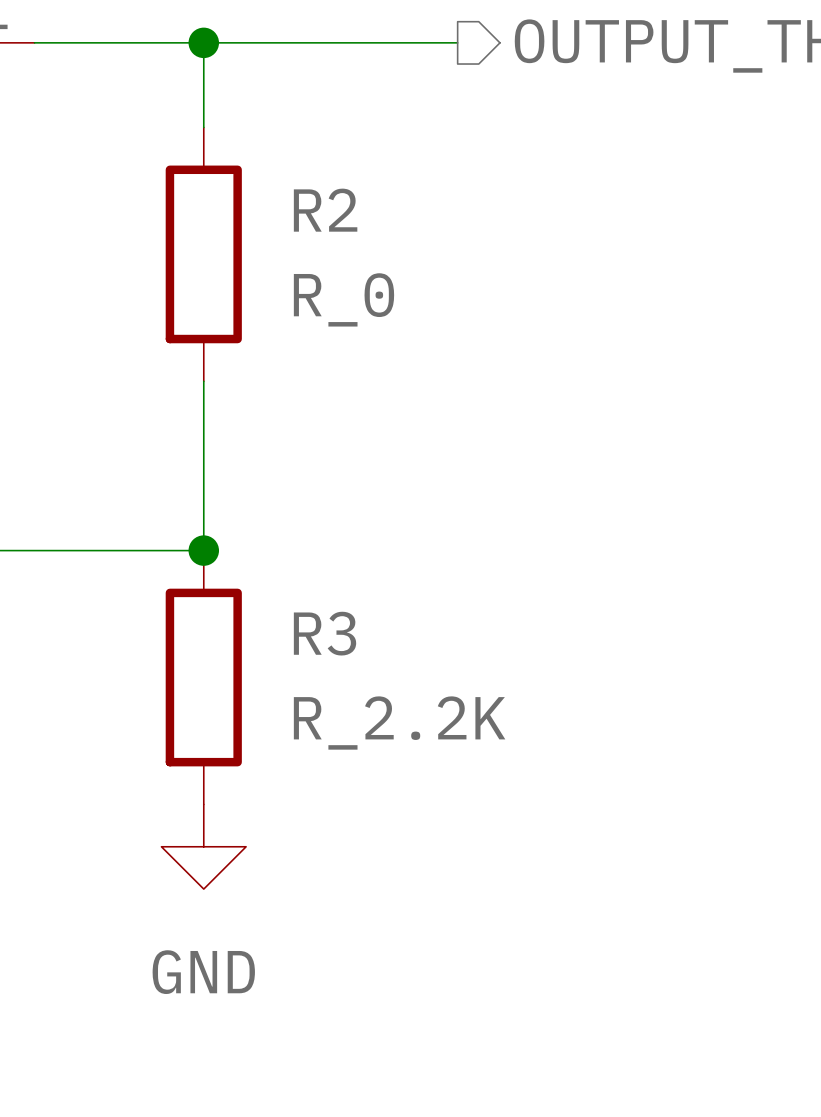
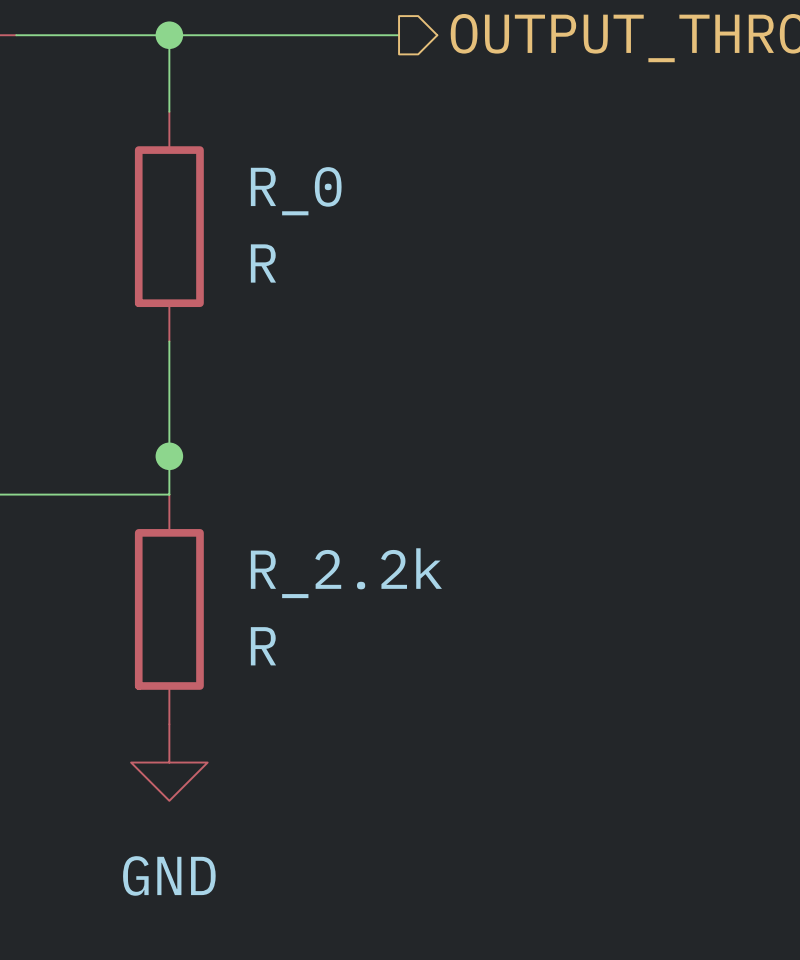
R2 name: R2 (325, 210) -> R_0 (296, 191)
R2 value: R_0 (343, 299) -> R (263, 263)
junction position: (203, 550) -> (169, 456)
R3 name: R3 (325, 633) -> R_2.2k (346, 573)
R3 value: R_2.2K (399, 723) -> R (263, 646)

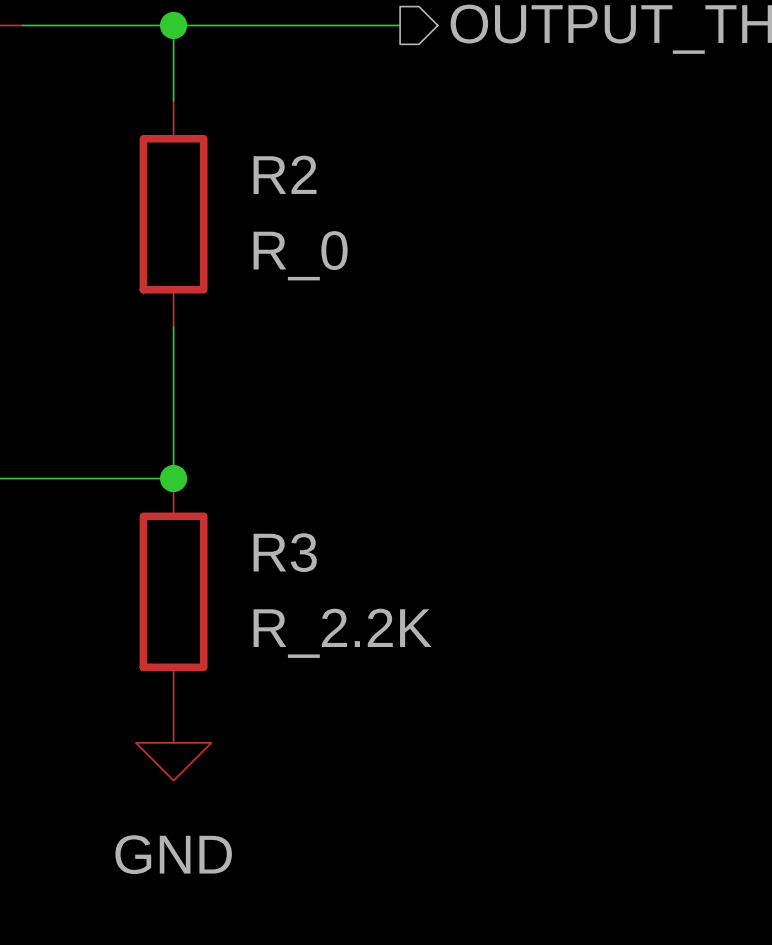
R_0 name: R_0 (296, 191) -> R2 (285, 174)
R_0 value: R (263, 263) -> R_0 (300, 255)
junction position: (169, 456) -> (173, 478)
R_2.2k name: R_2.2k (346, 573) -> R3 (285, 552)
R_2.2k value: R (263, 646) -> R_2.2K (342, 633)

